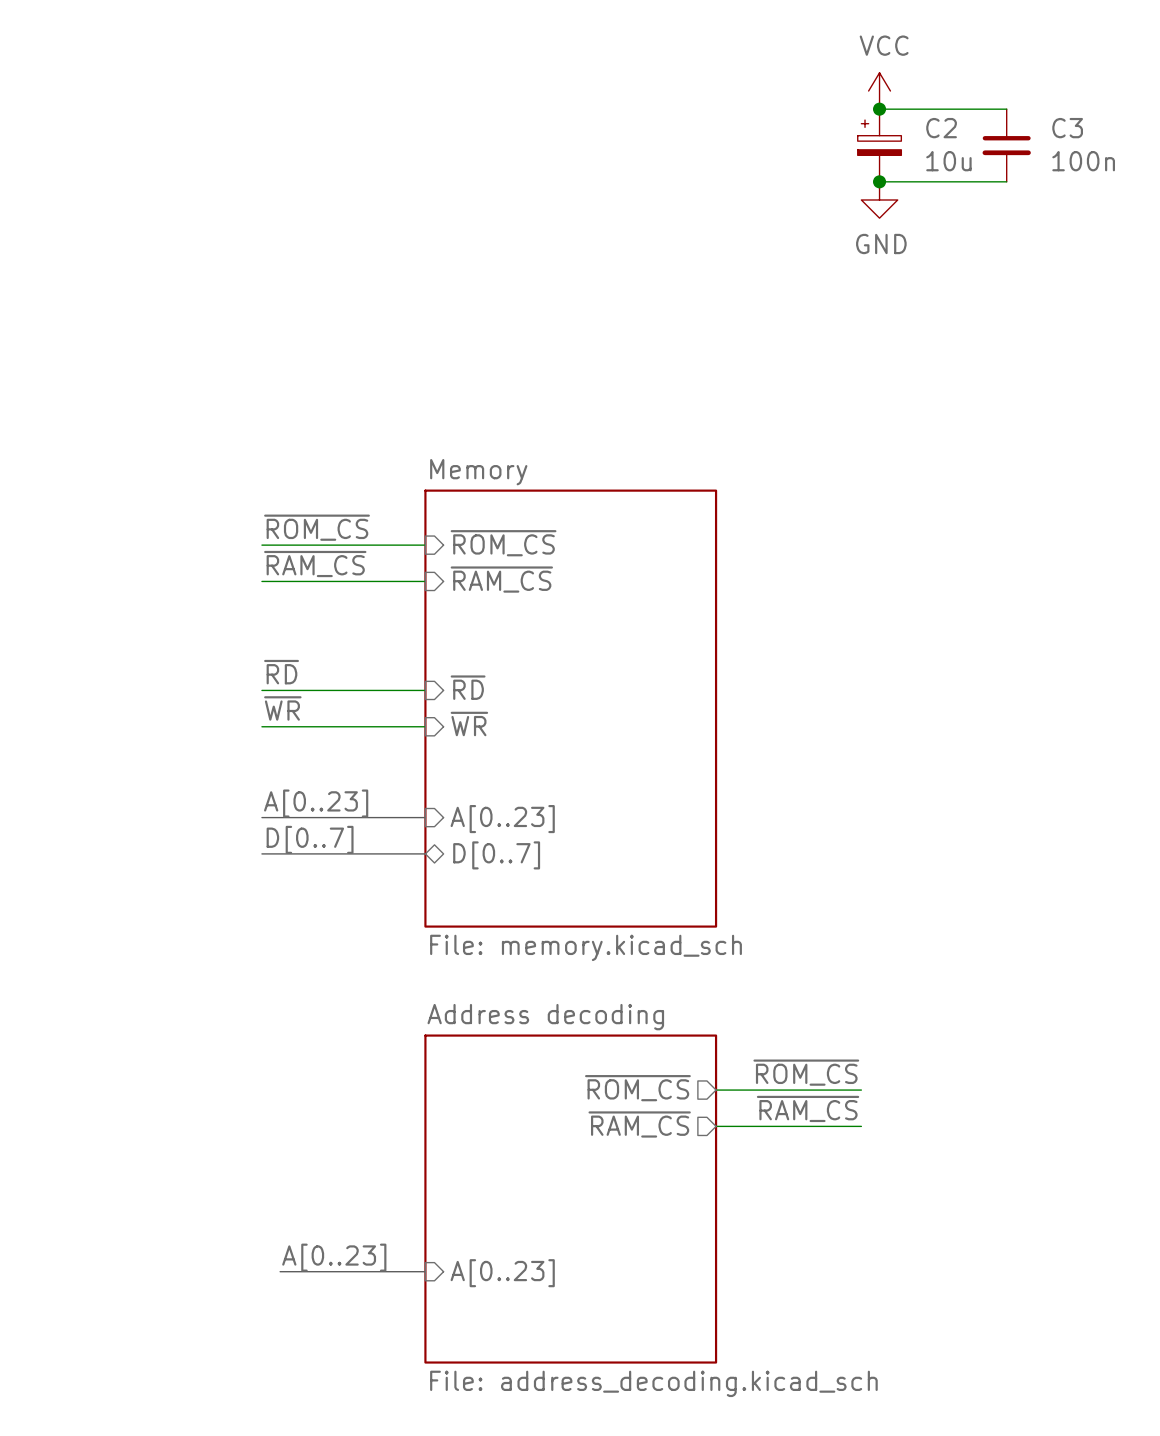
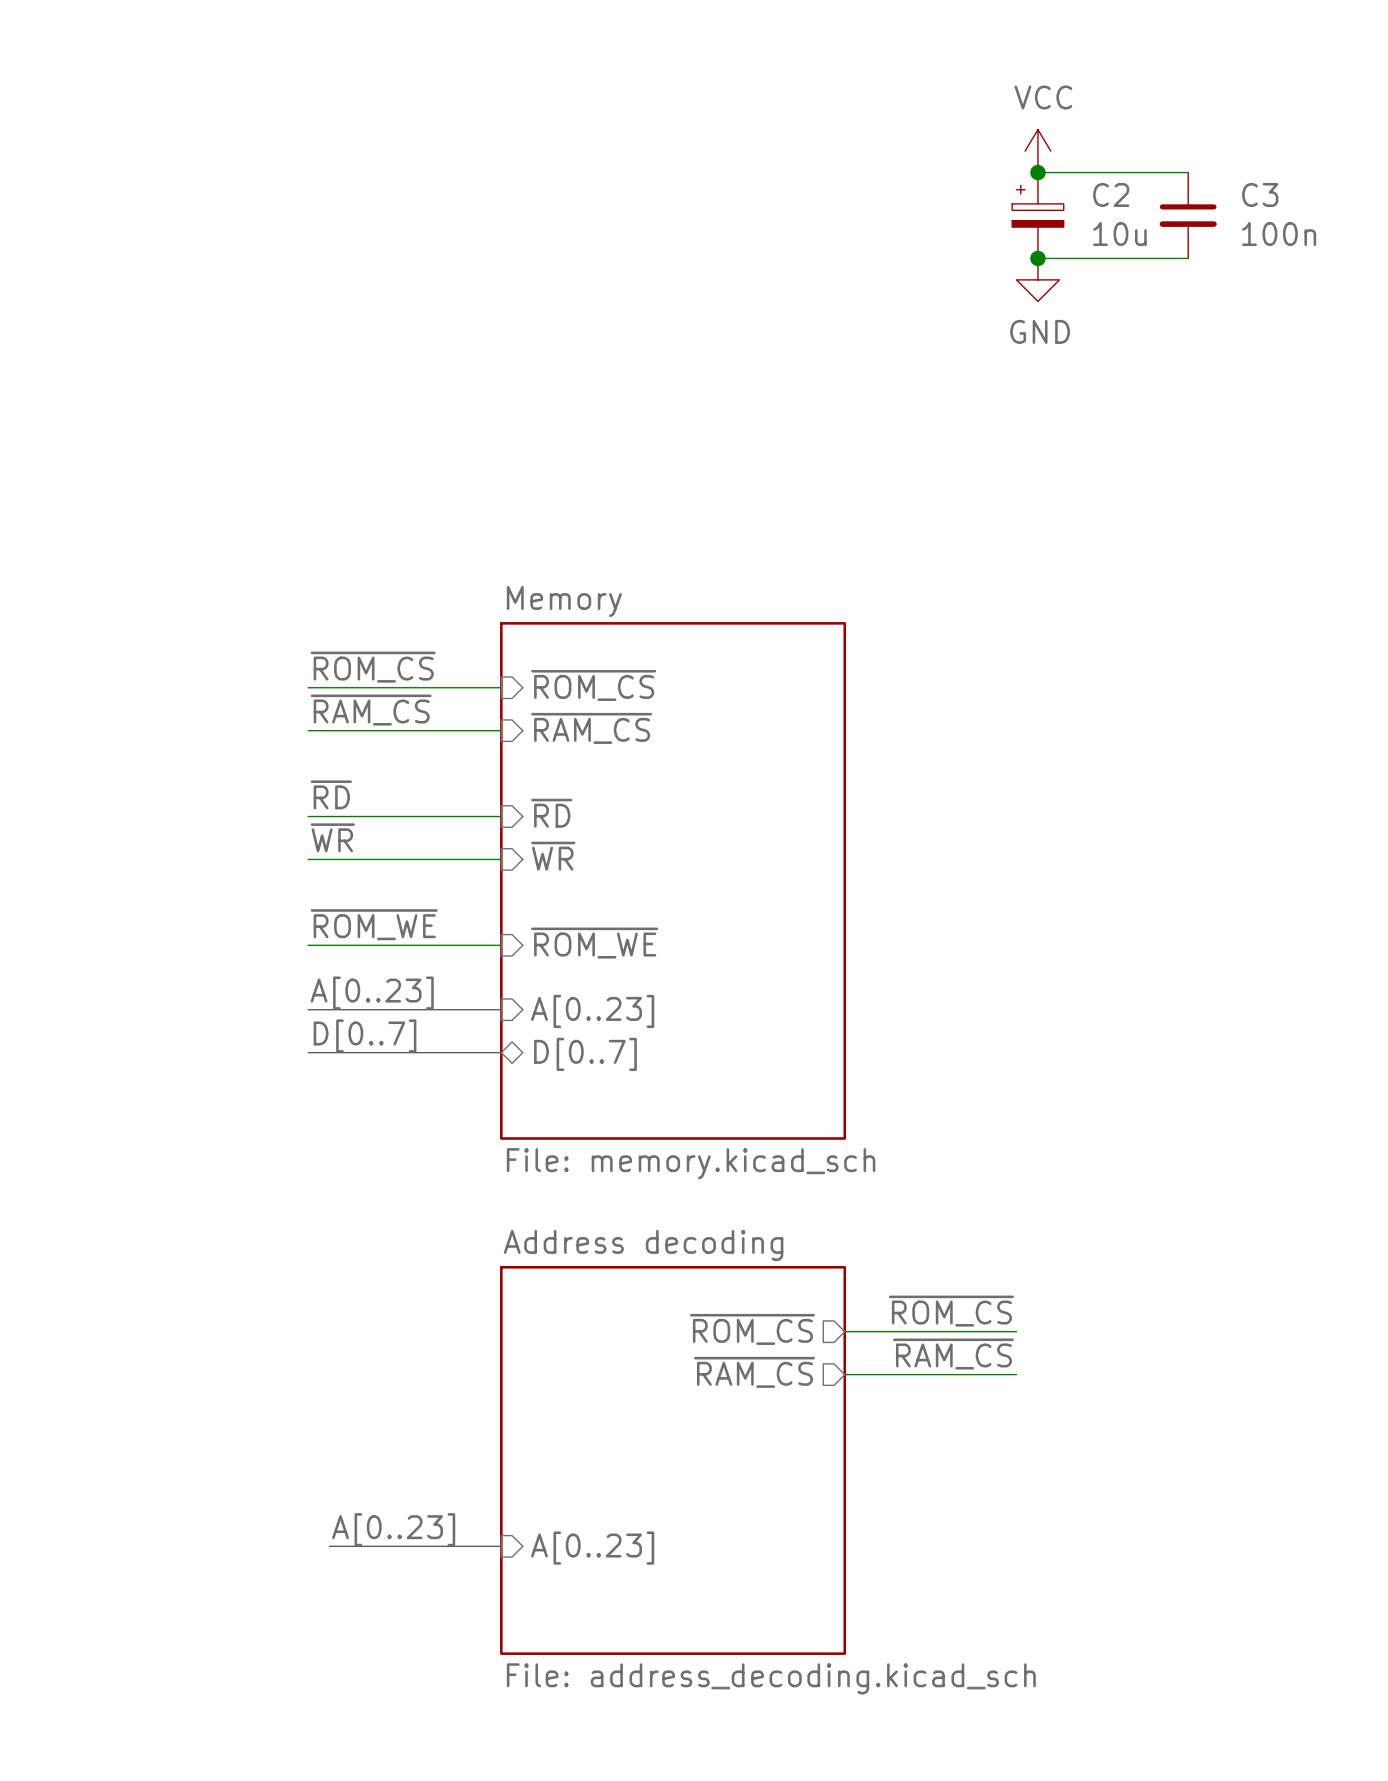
label: none -> ~{RD} (331, 794)
sheet pin: none -> ~{RD} (551, 813)
wire: none -> (308, 816) (501, 816)
label: ~{RD} (281, 672) -> ~{WR} (332, 837)
sheet pin: ~{RD} (468, 687) -> ~{WR} (553, 856)
label: ~{WR} (282, 708) -> none
sheet pin: ~{WR} (469, 724) -> none
wire: (261, 726) (425, 726) -> (308, 945) (501, 945)
label: none -> ~{ROM_WE} (374, 924)
sheet pin: none -> ~{ROM_WE} (594, 943)

